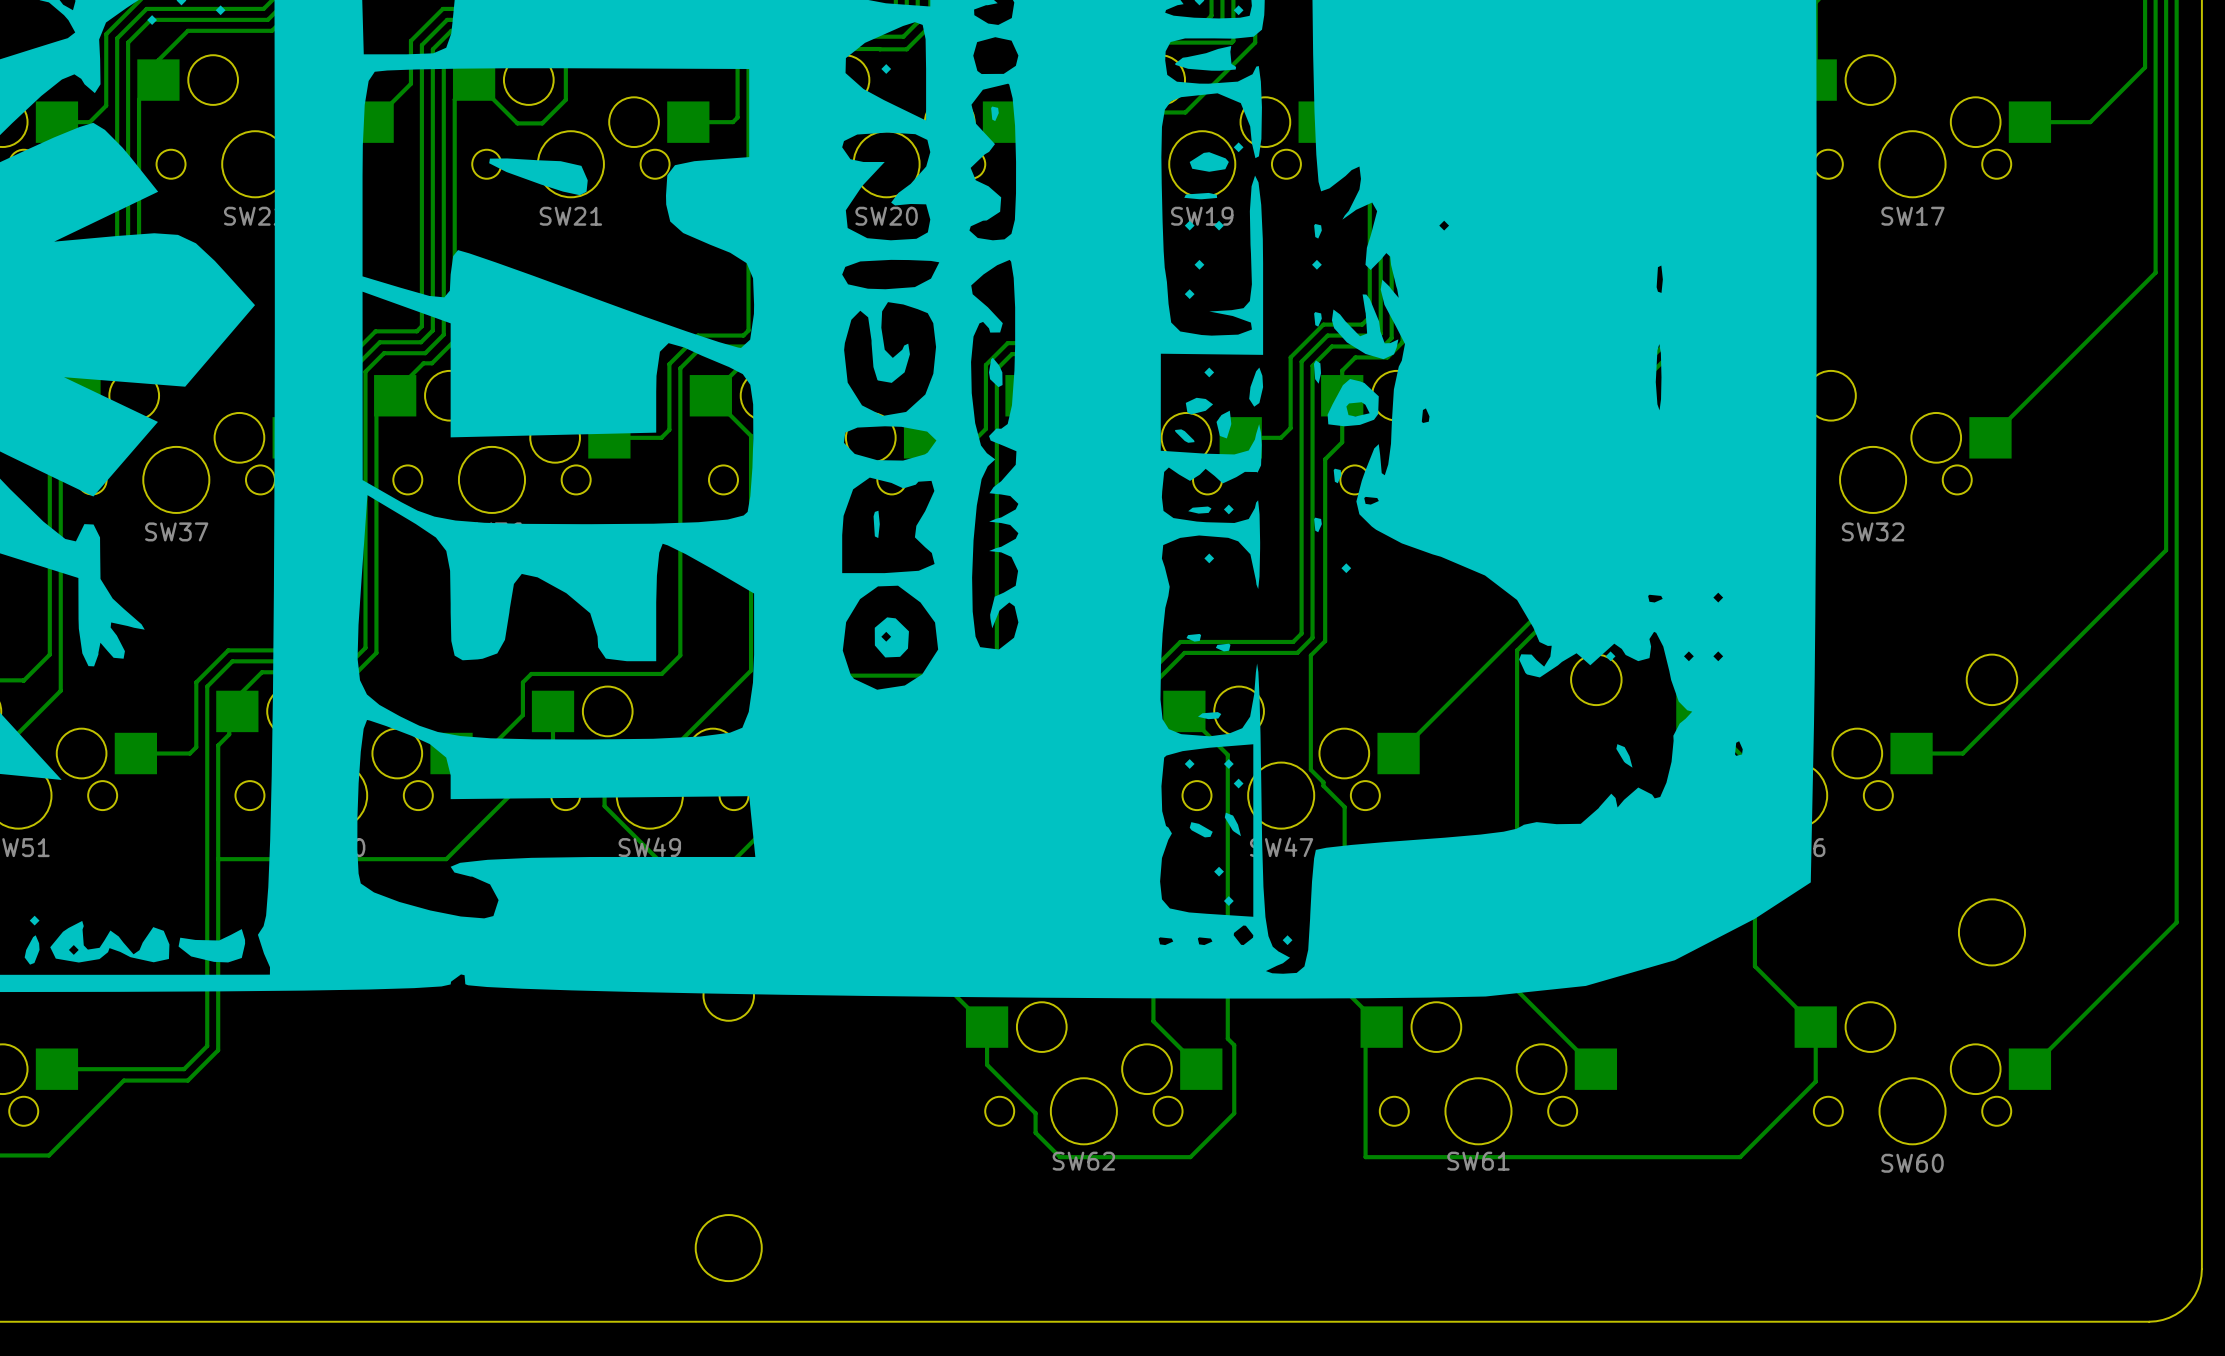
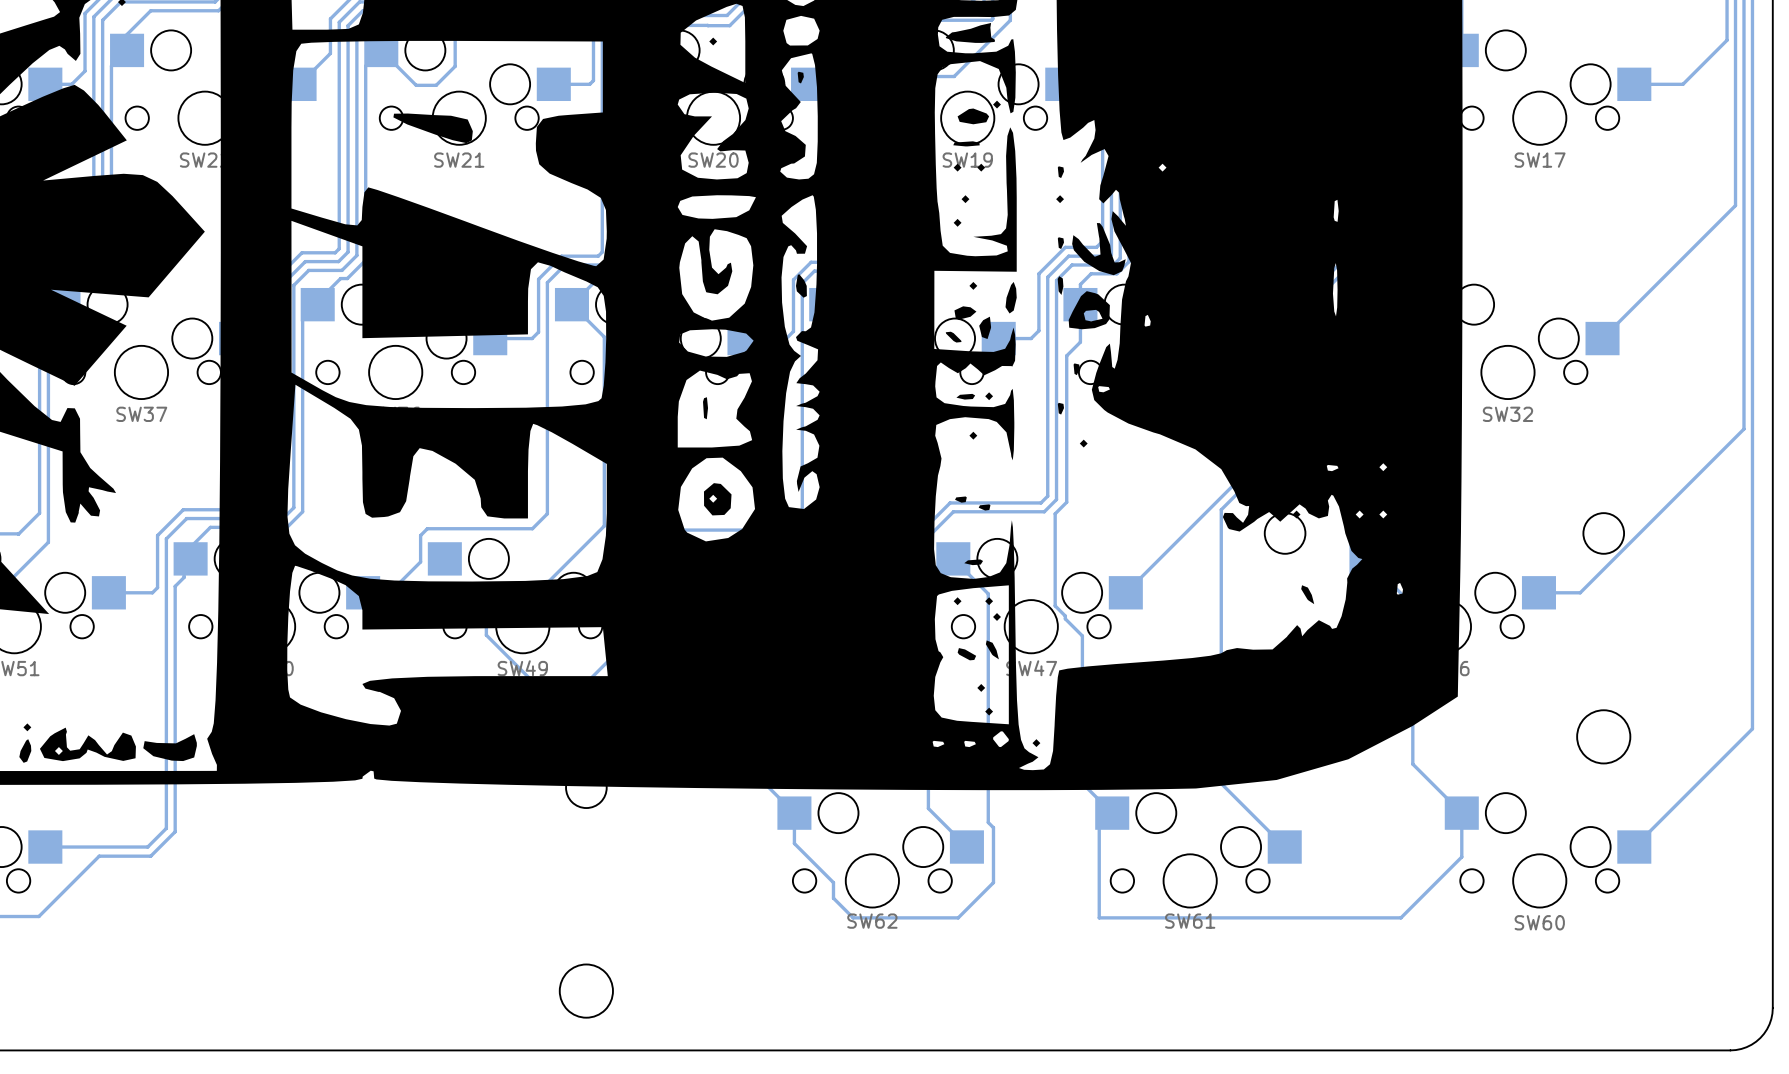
track: (553, 711) (553, 752) (446, 859) (218, 859) -> none

